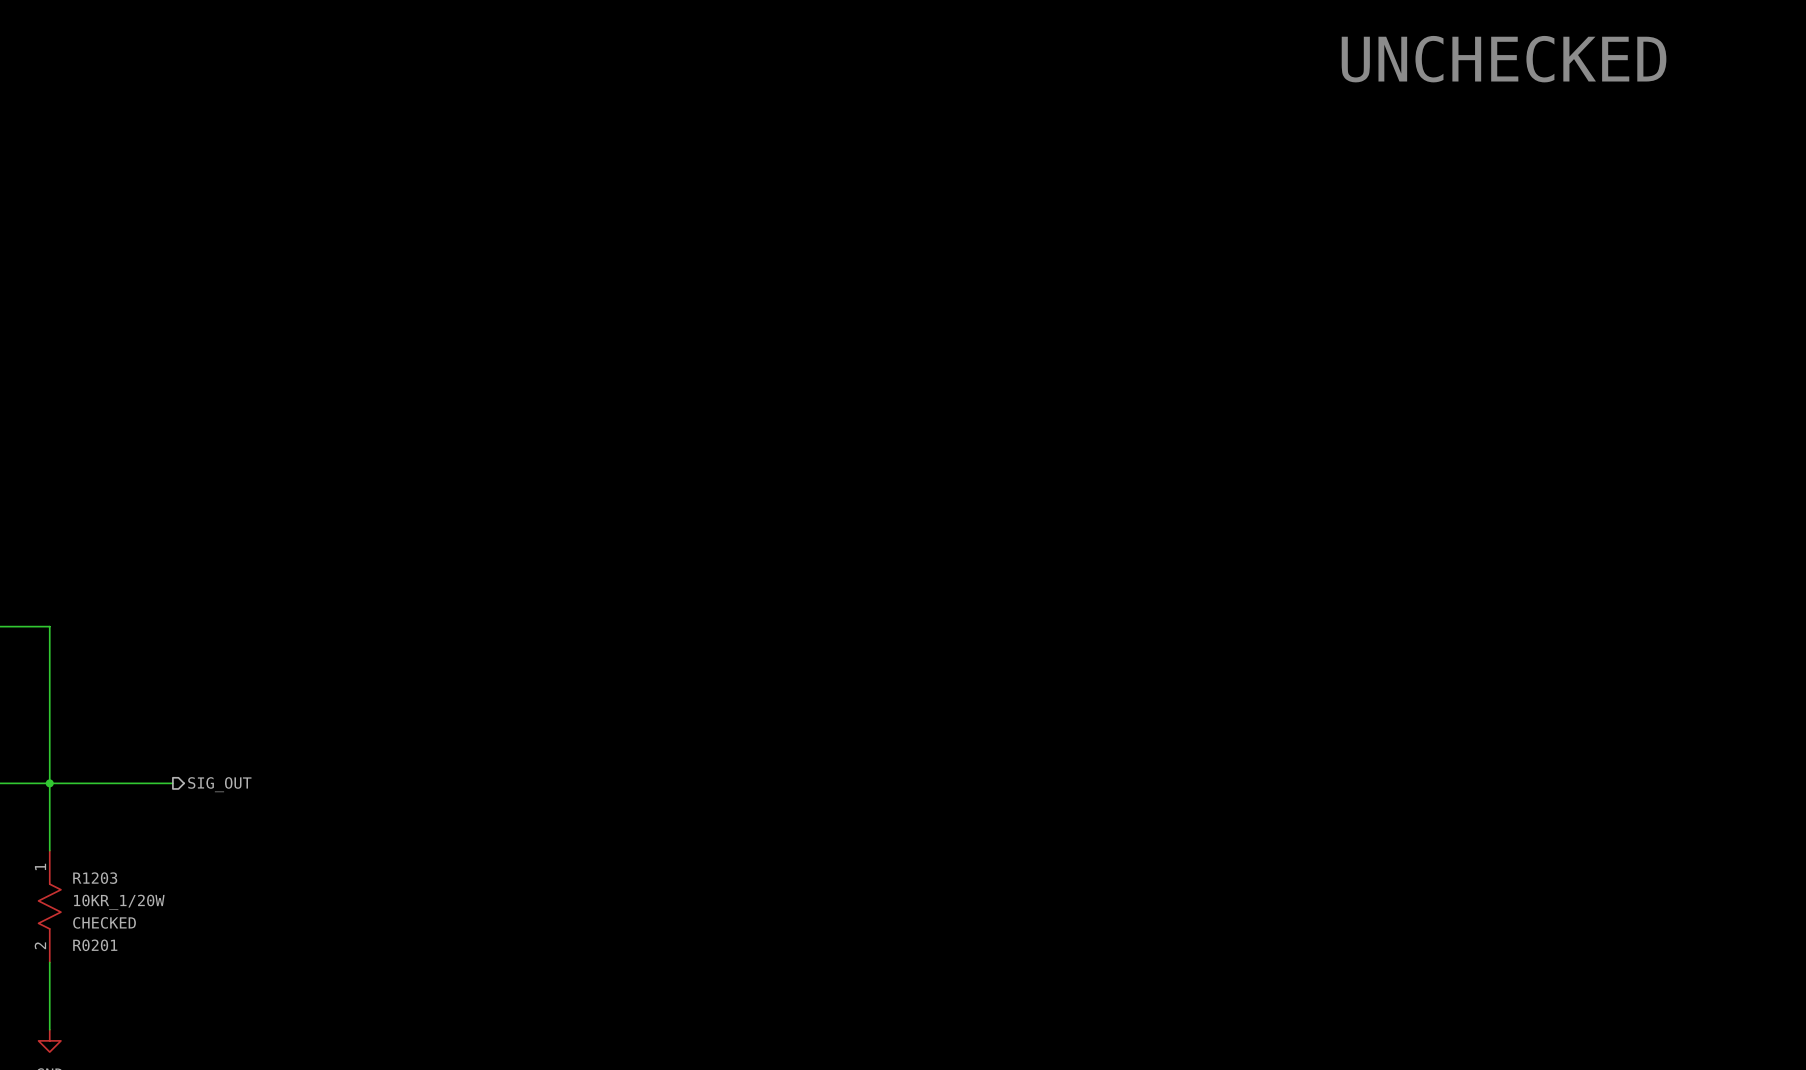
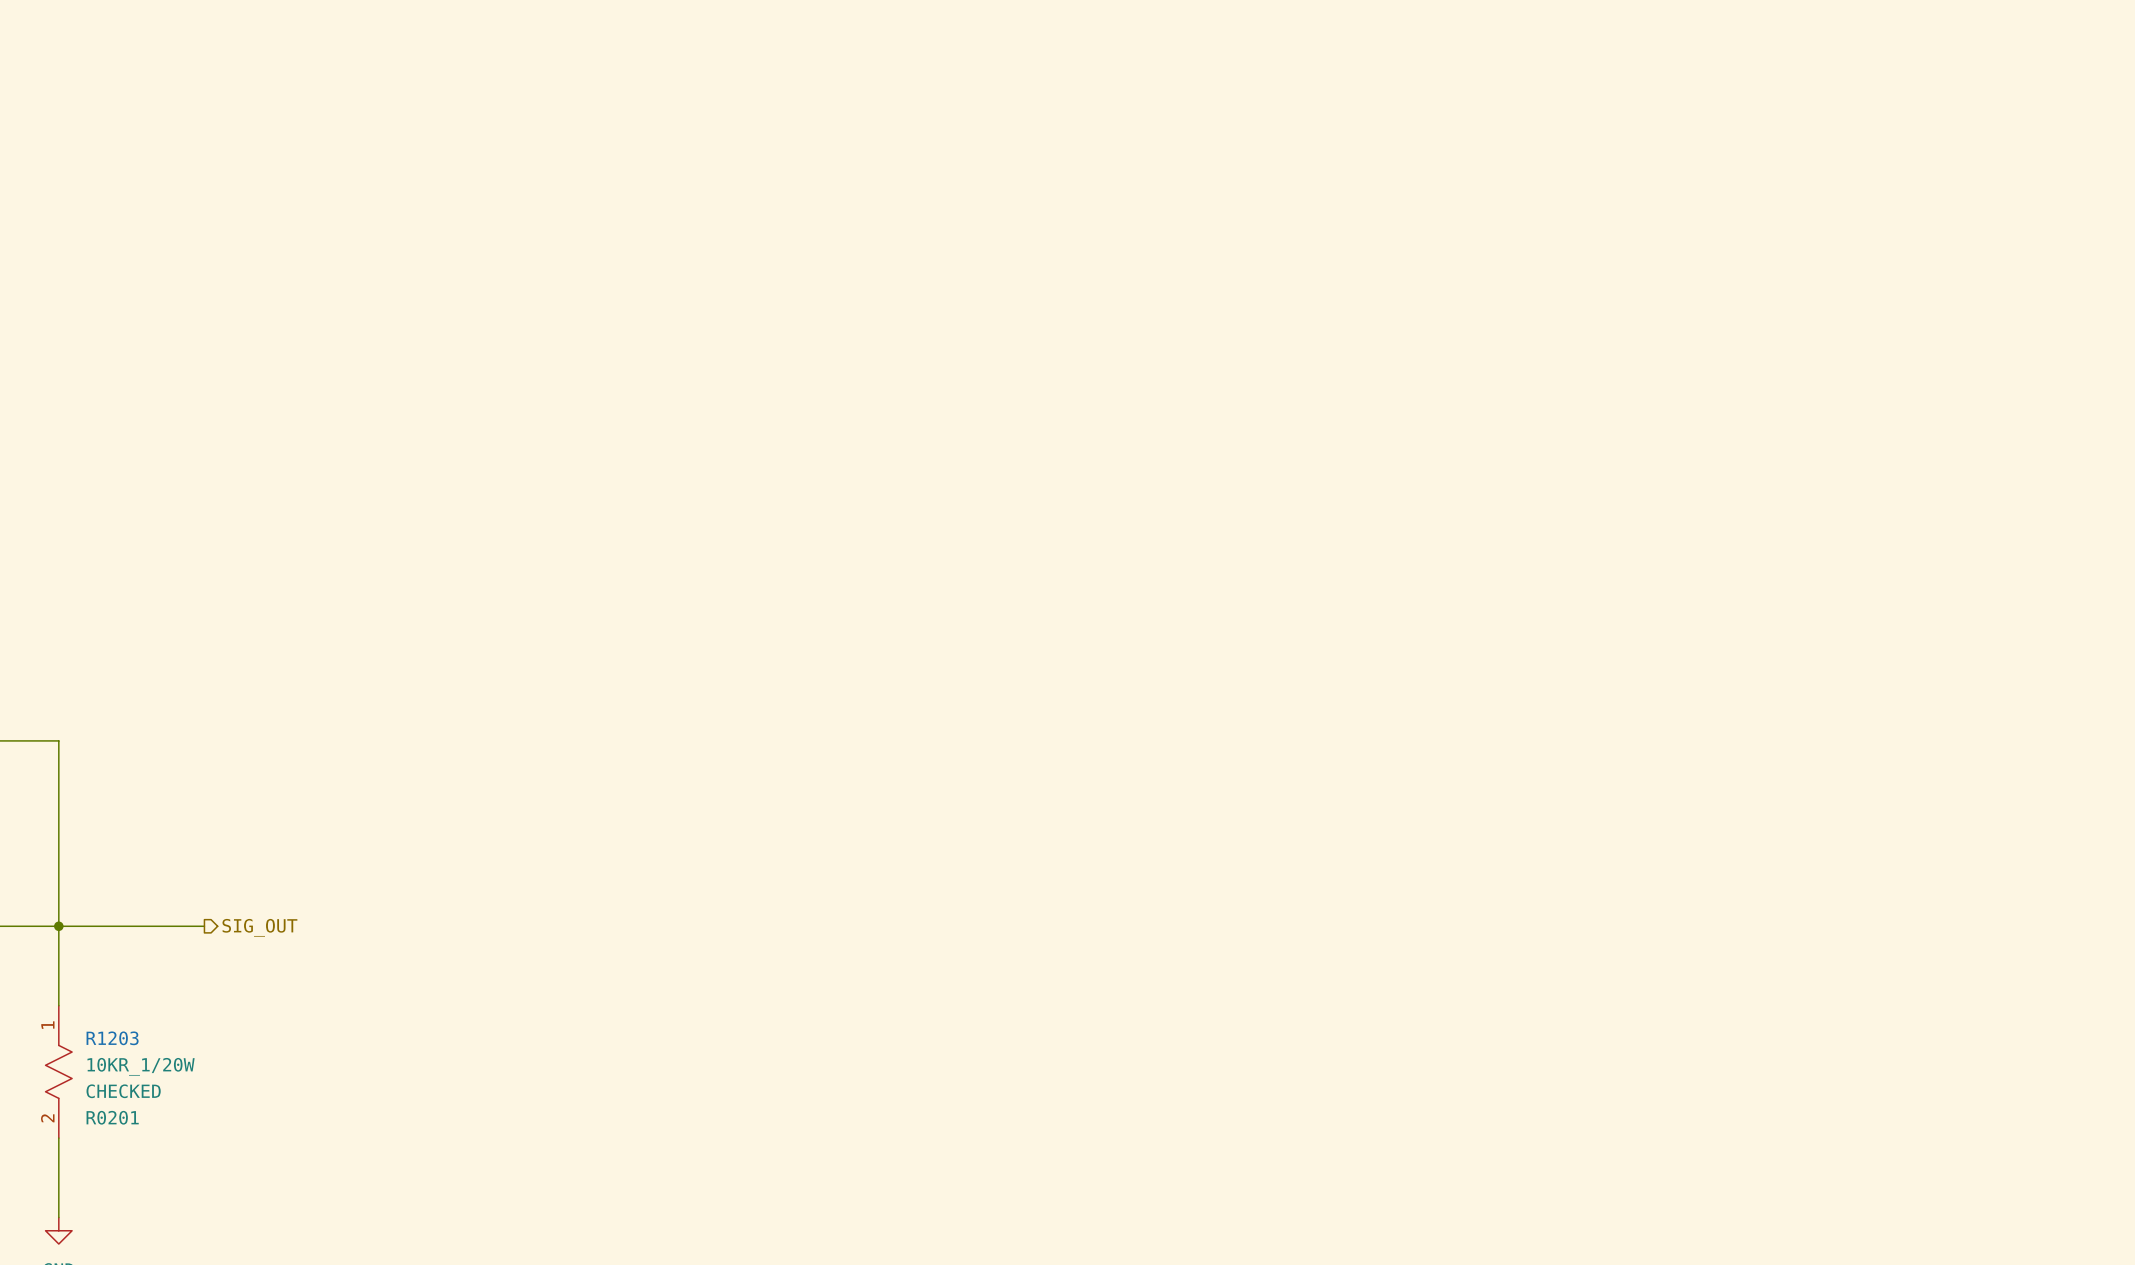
text: UNCHECKED (1504, 59) -> none

